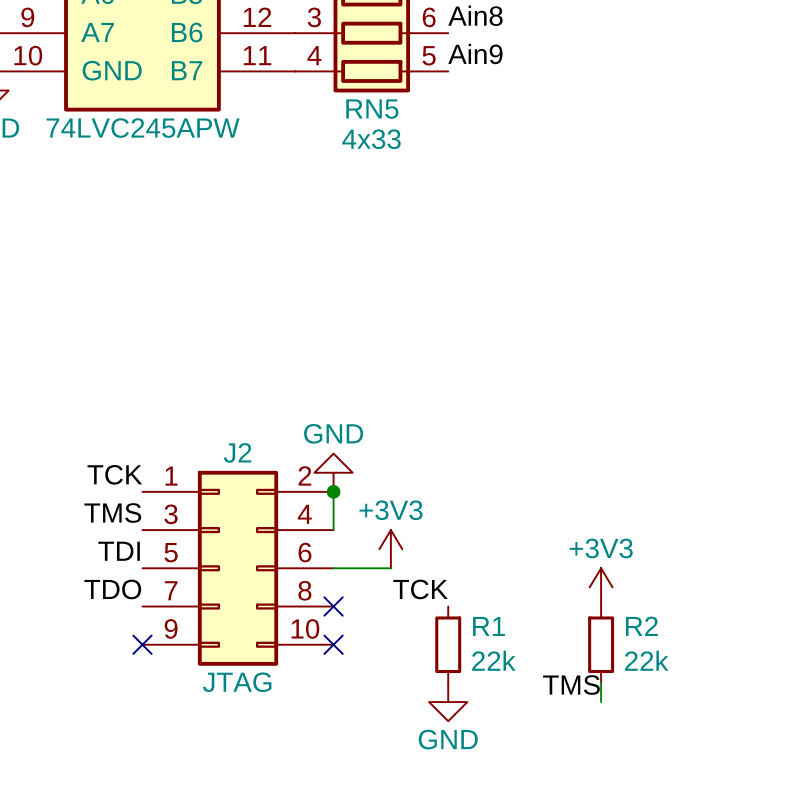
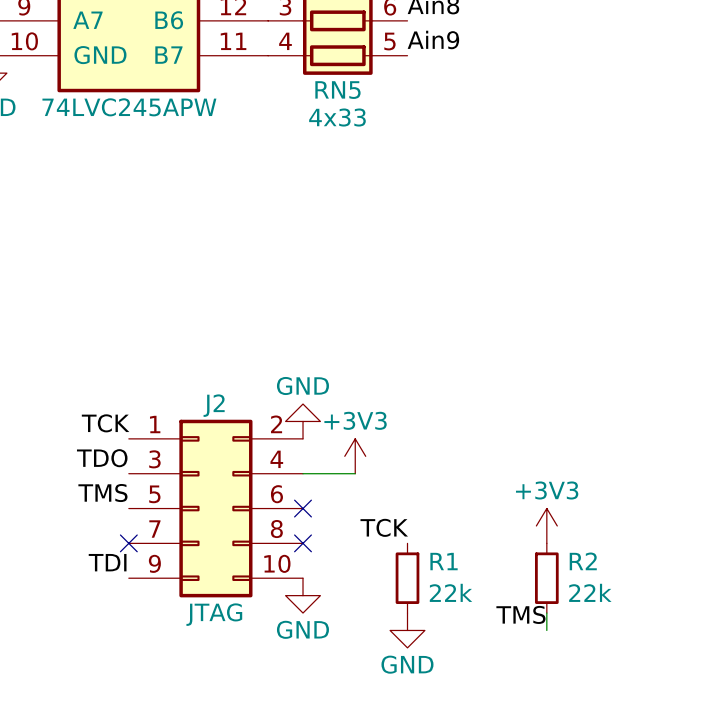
wire: (333, 491) (333, 530) -> (355, 473) (303, 473)
junction: (333, 491) -> none
label: TMS (112, 513) -> TDO (102, 458)
power symbol position: +3V3 (390, 549) -> +3V3 (355, 456)
label: TDI (119, 551) -> TMS (102, 493)
wire: (333, 568) (390, 568) -> none
label: TDO (112, 589) -> TDI (107, 562)
no-connect mark position: (142, 644) -> (128, 543)
no-connect mark position: (333, 644) -> (303, 508)
power symbol: none -> GND (303, 595)

